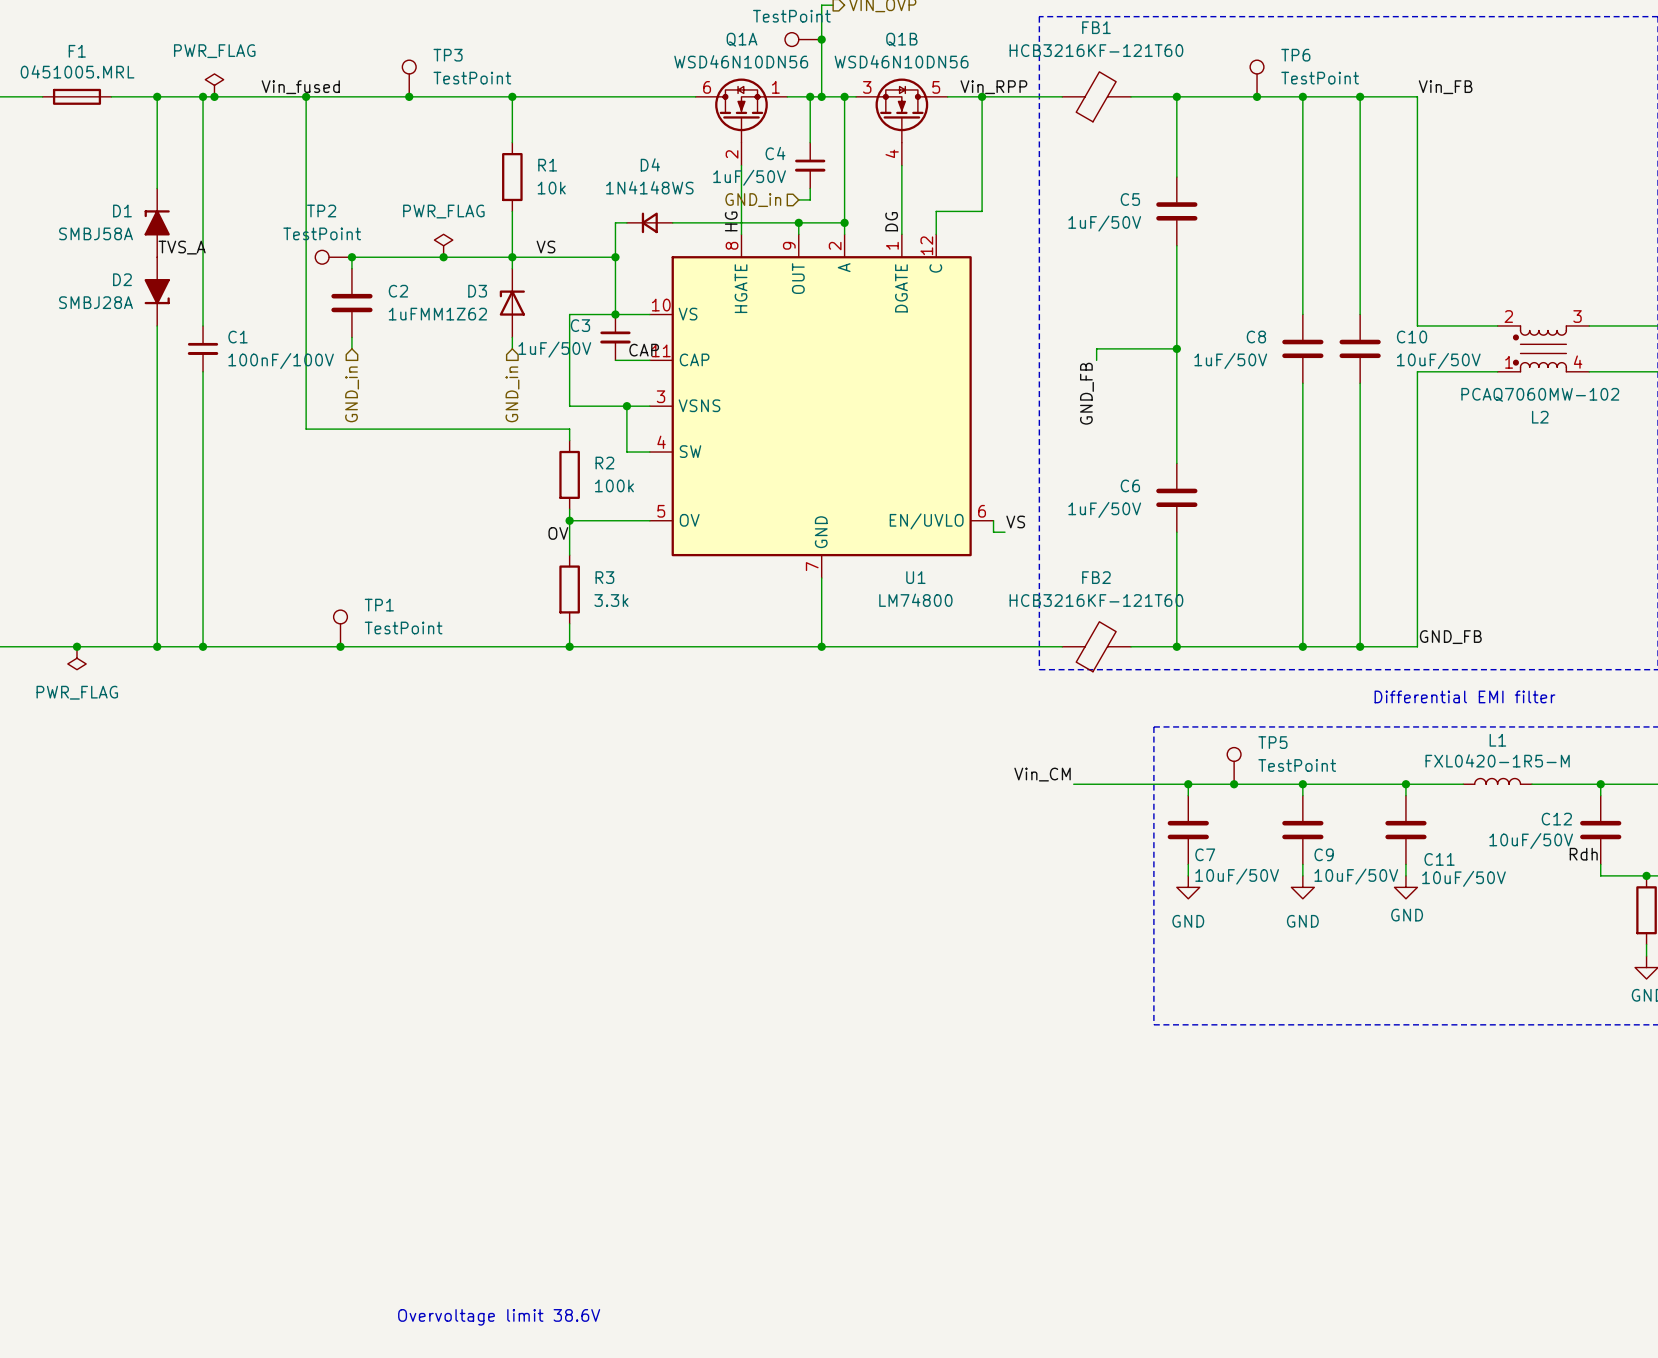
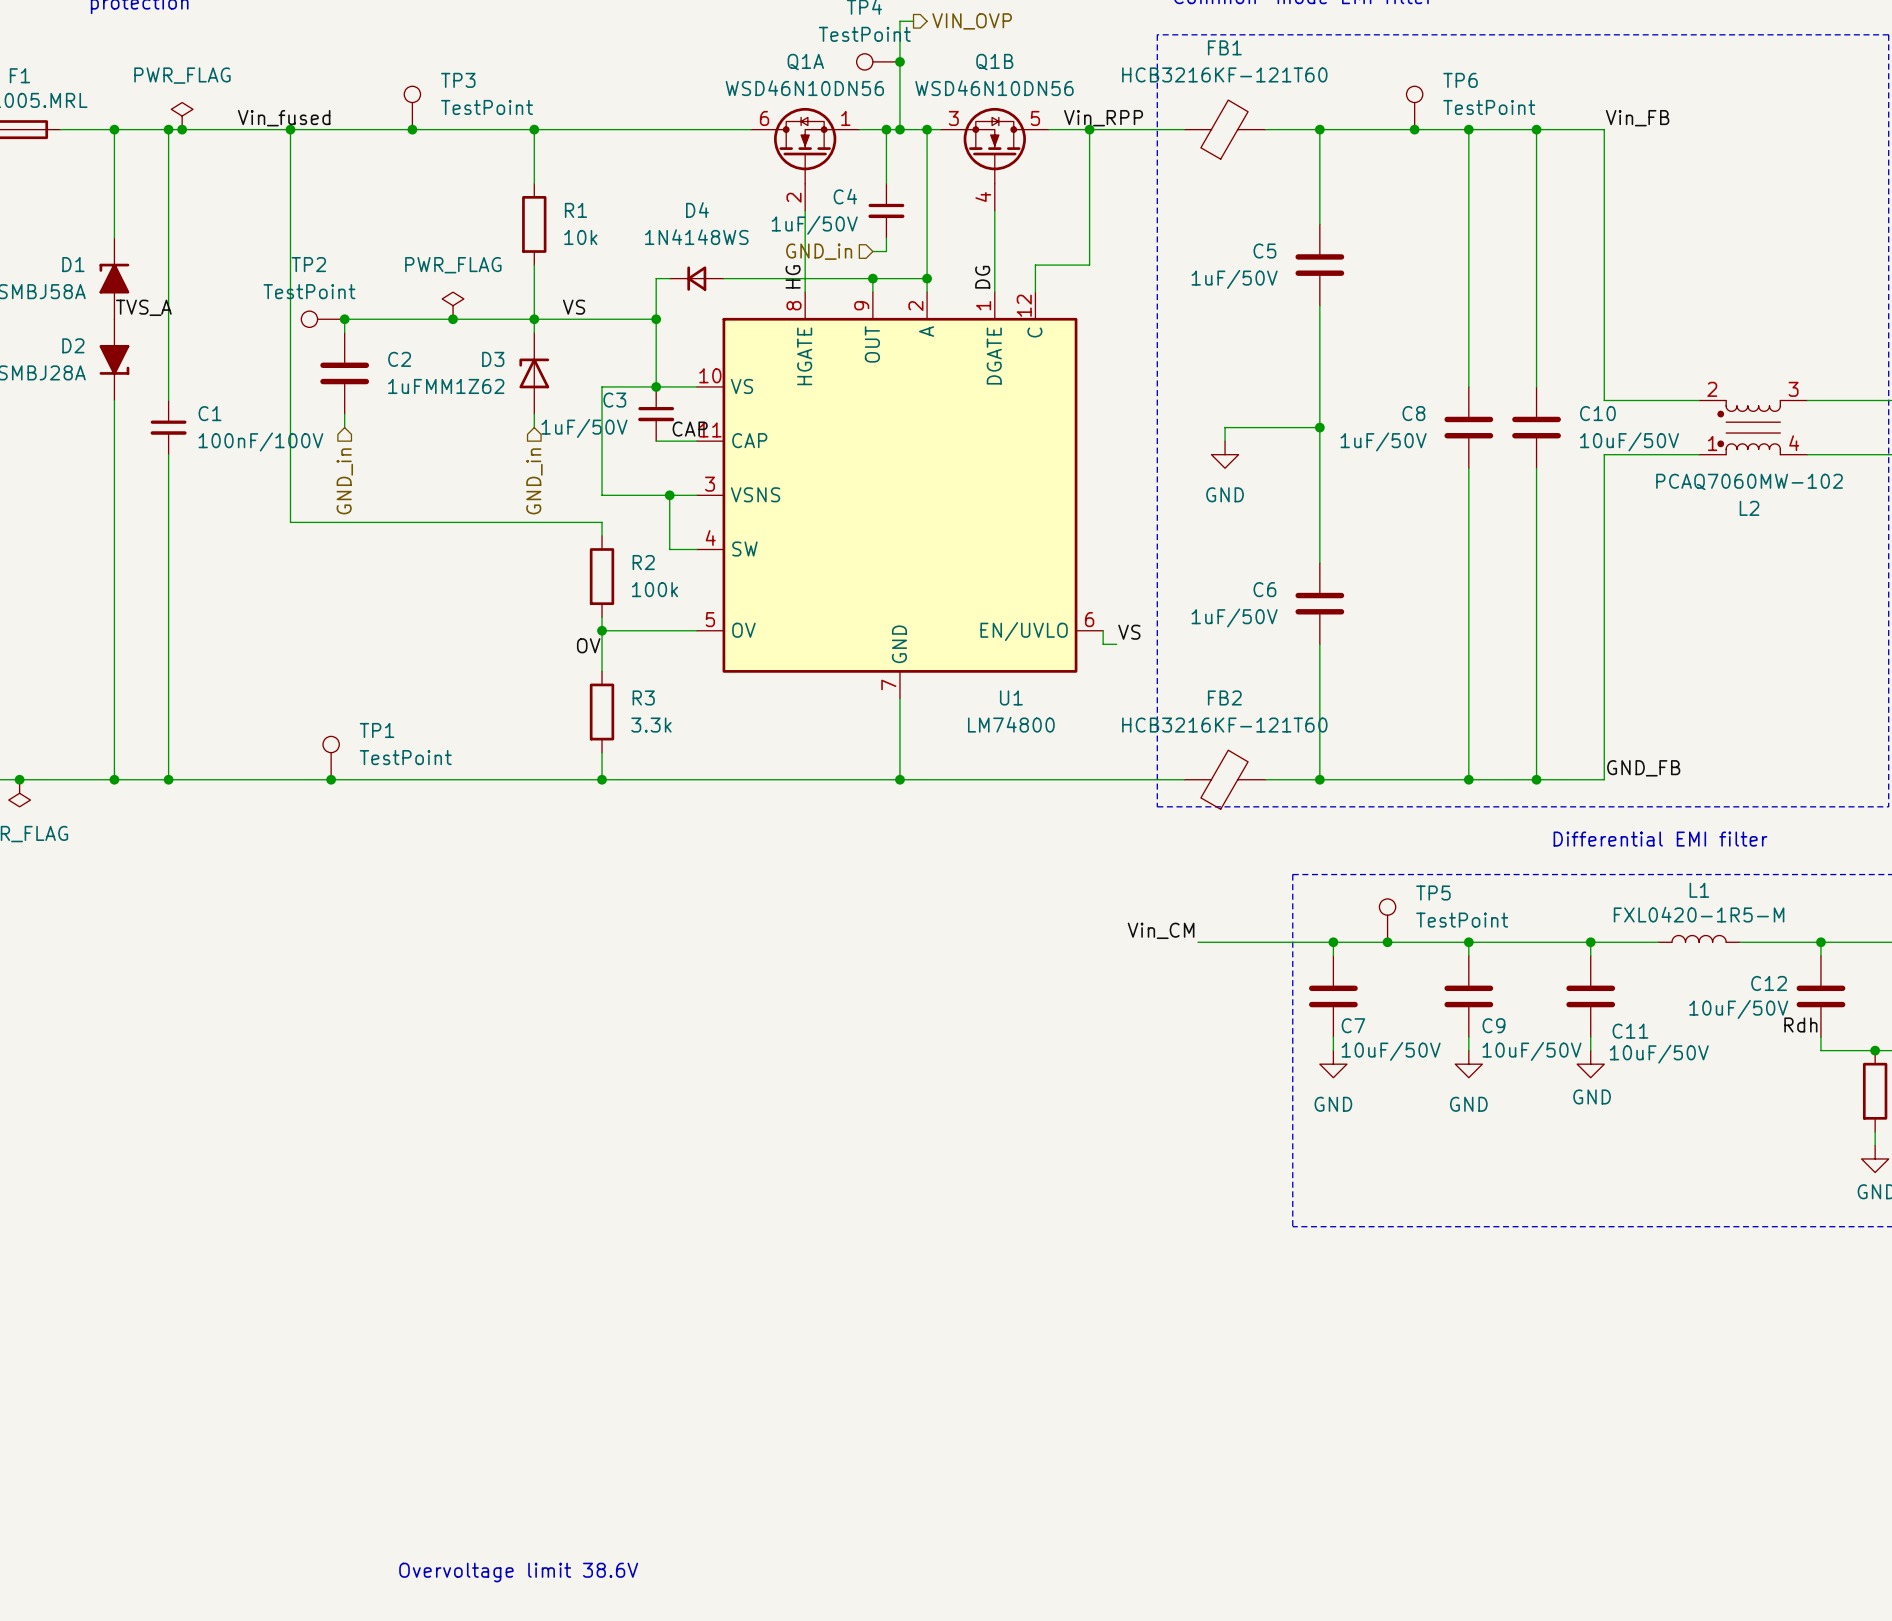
power symbol: none -> GND (1225, 454)
label: GND_FB (1086, 393) -> none

